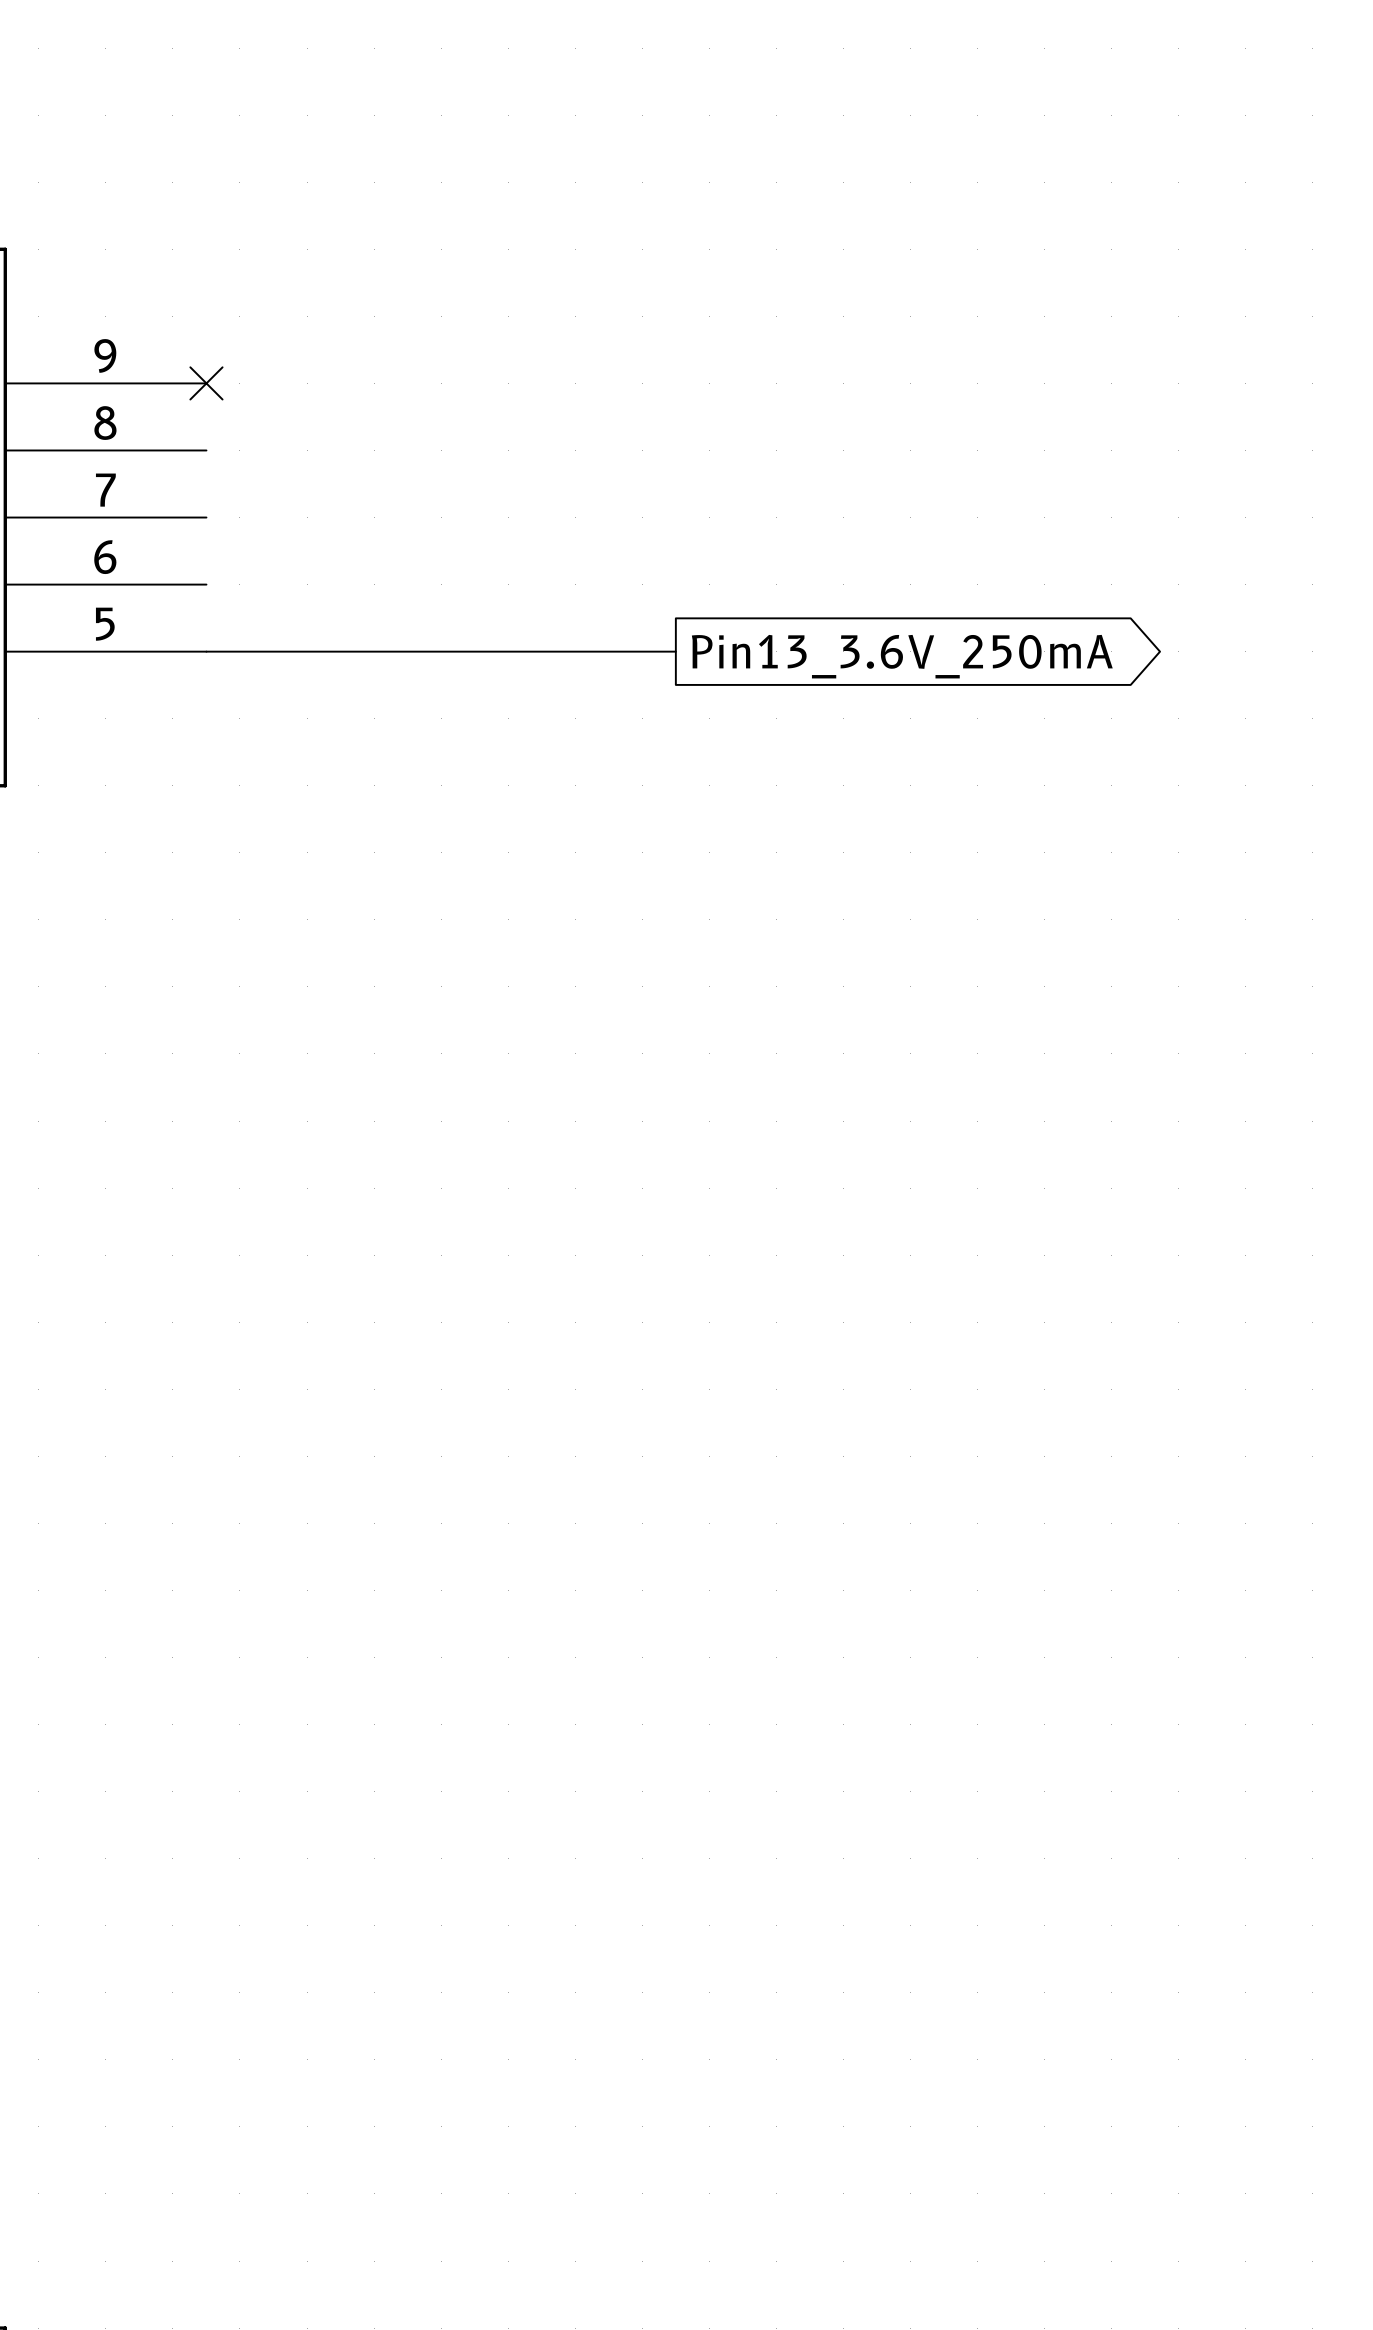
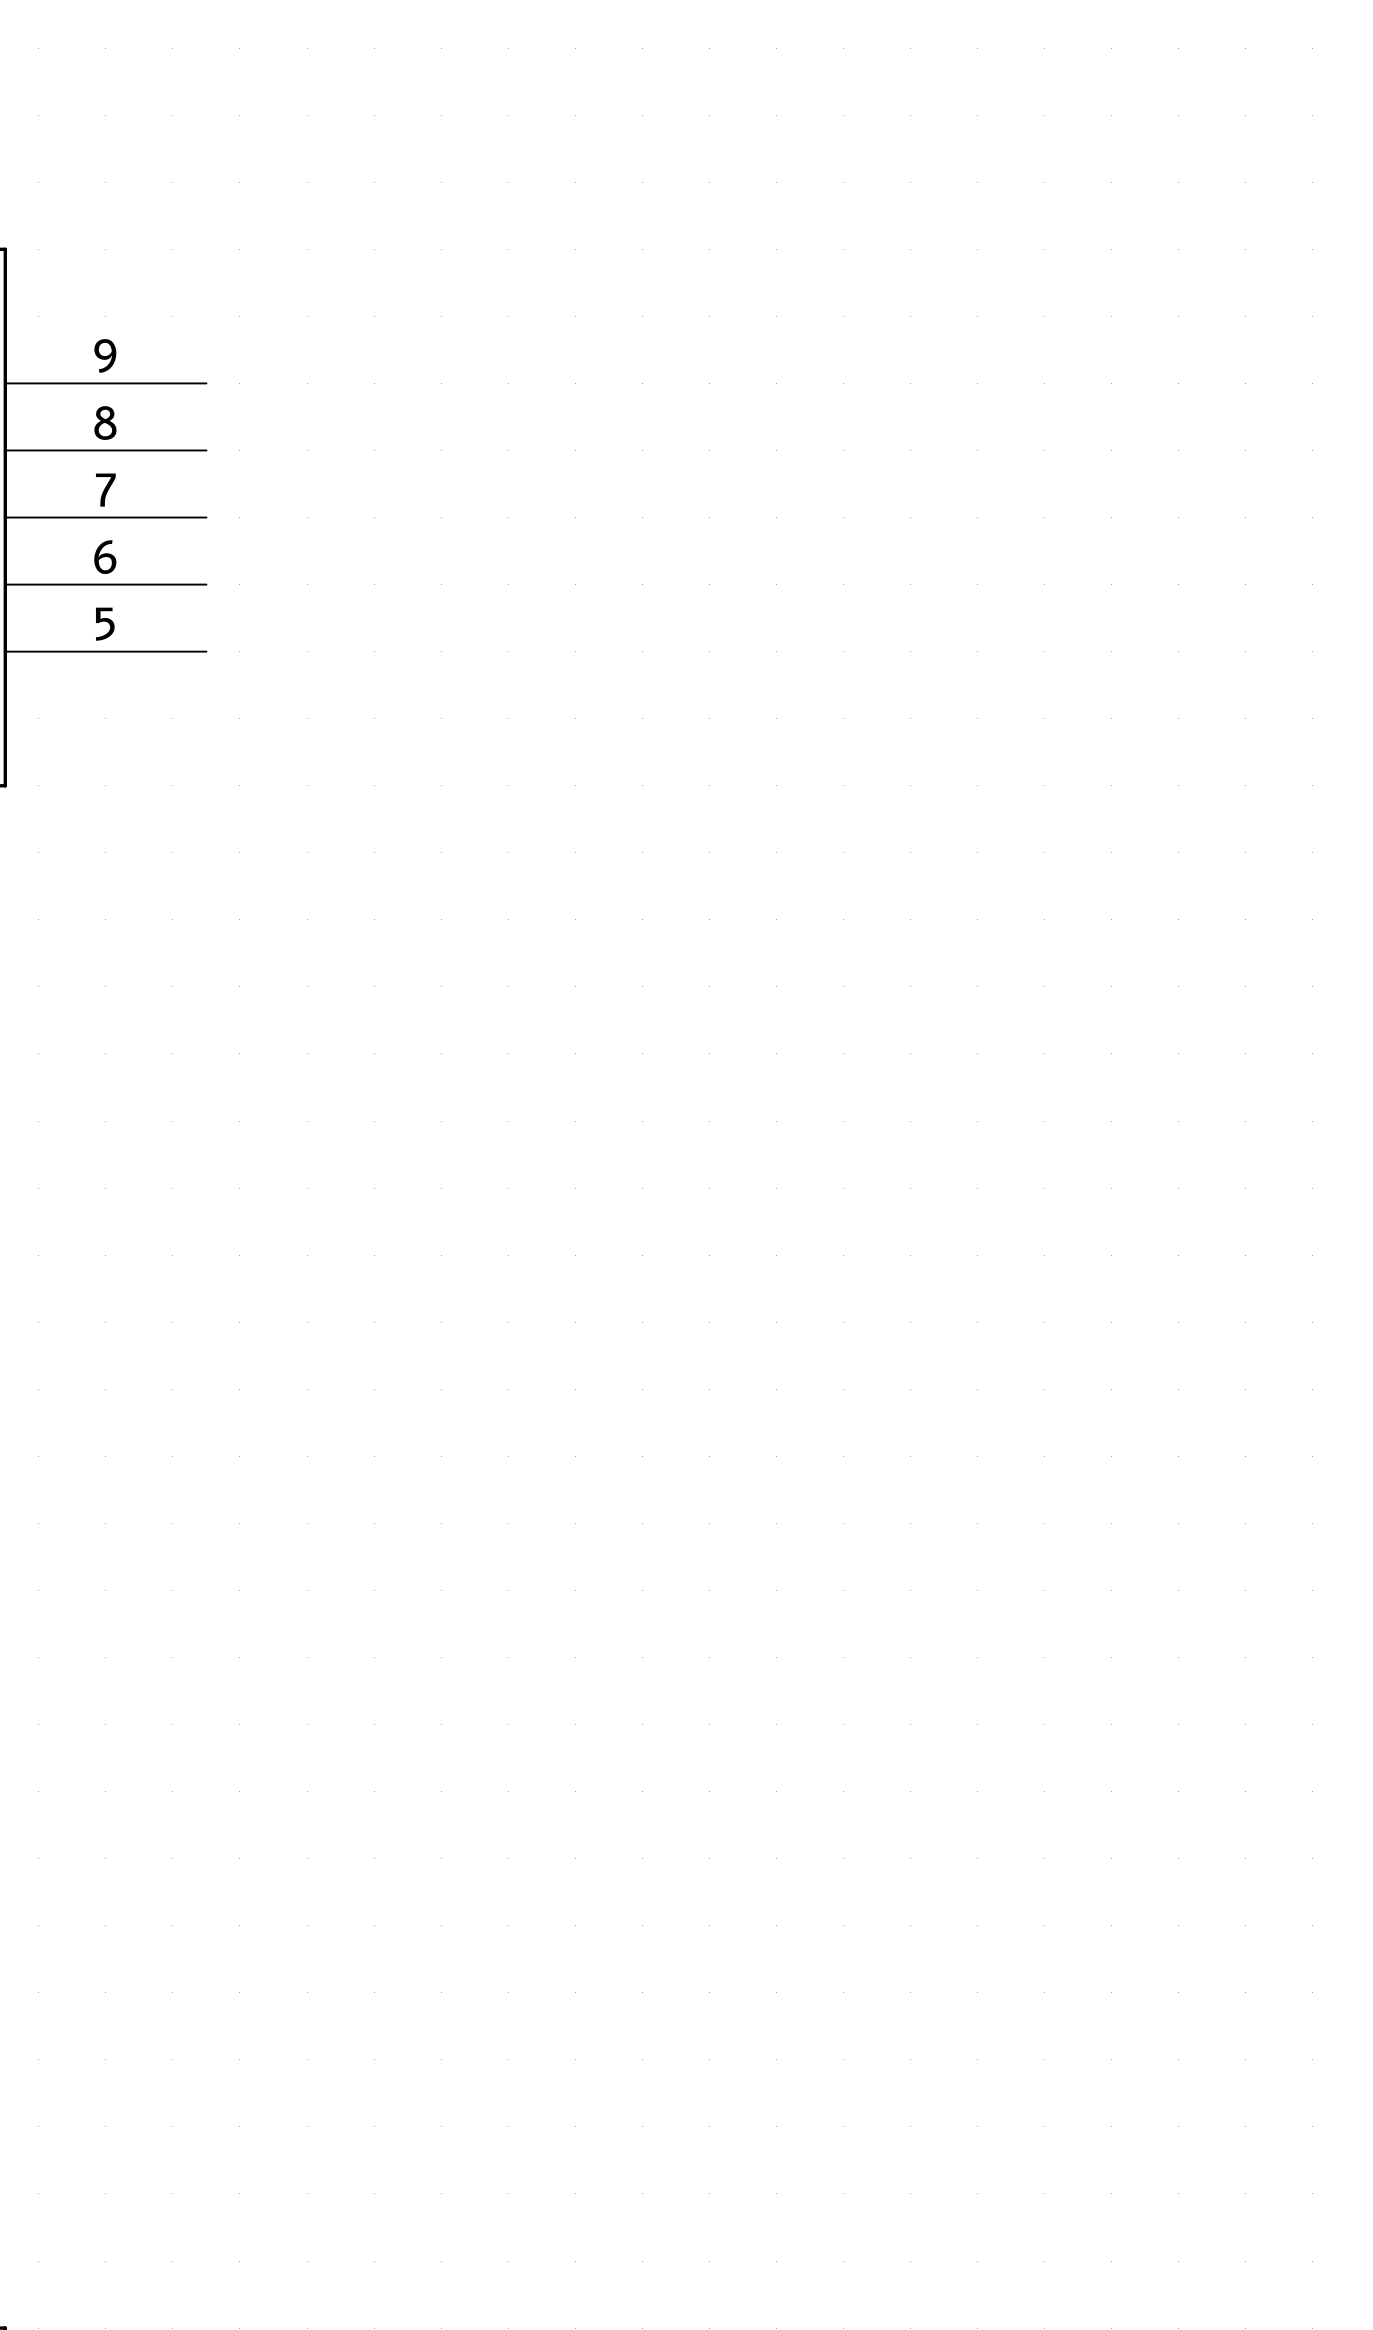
no-connect mark: (206, 383) -> none
wire: (206, 651) (675, 651) -> none
global label: Pin13_3.6V_250mA (902, 656) -> none

